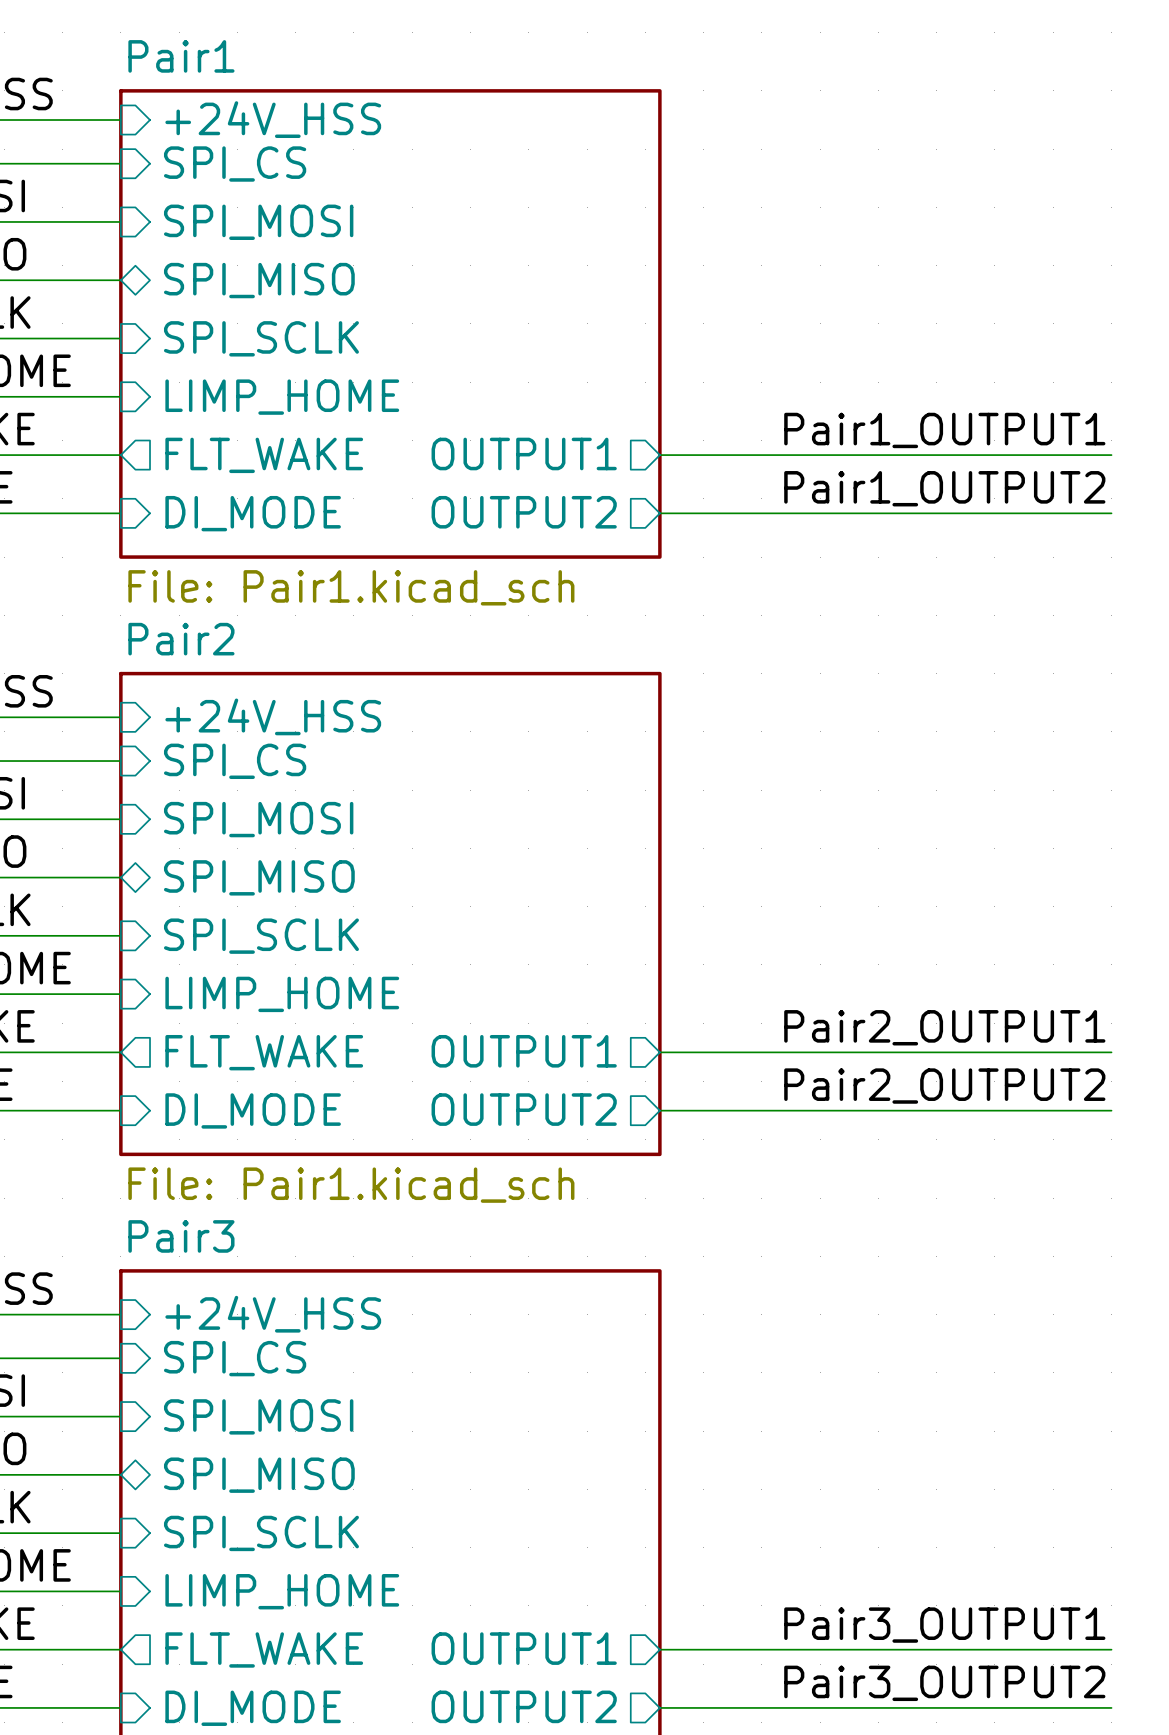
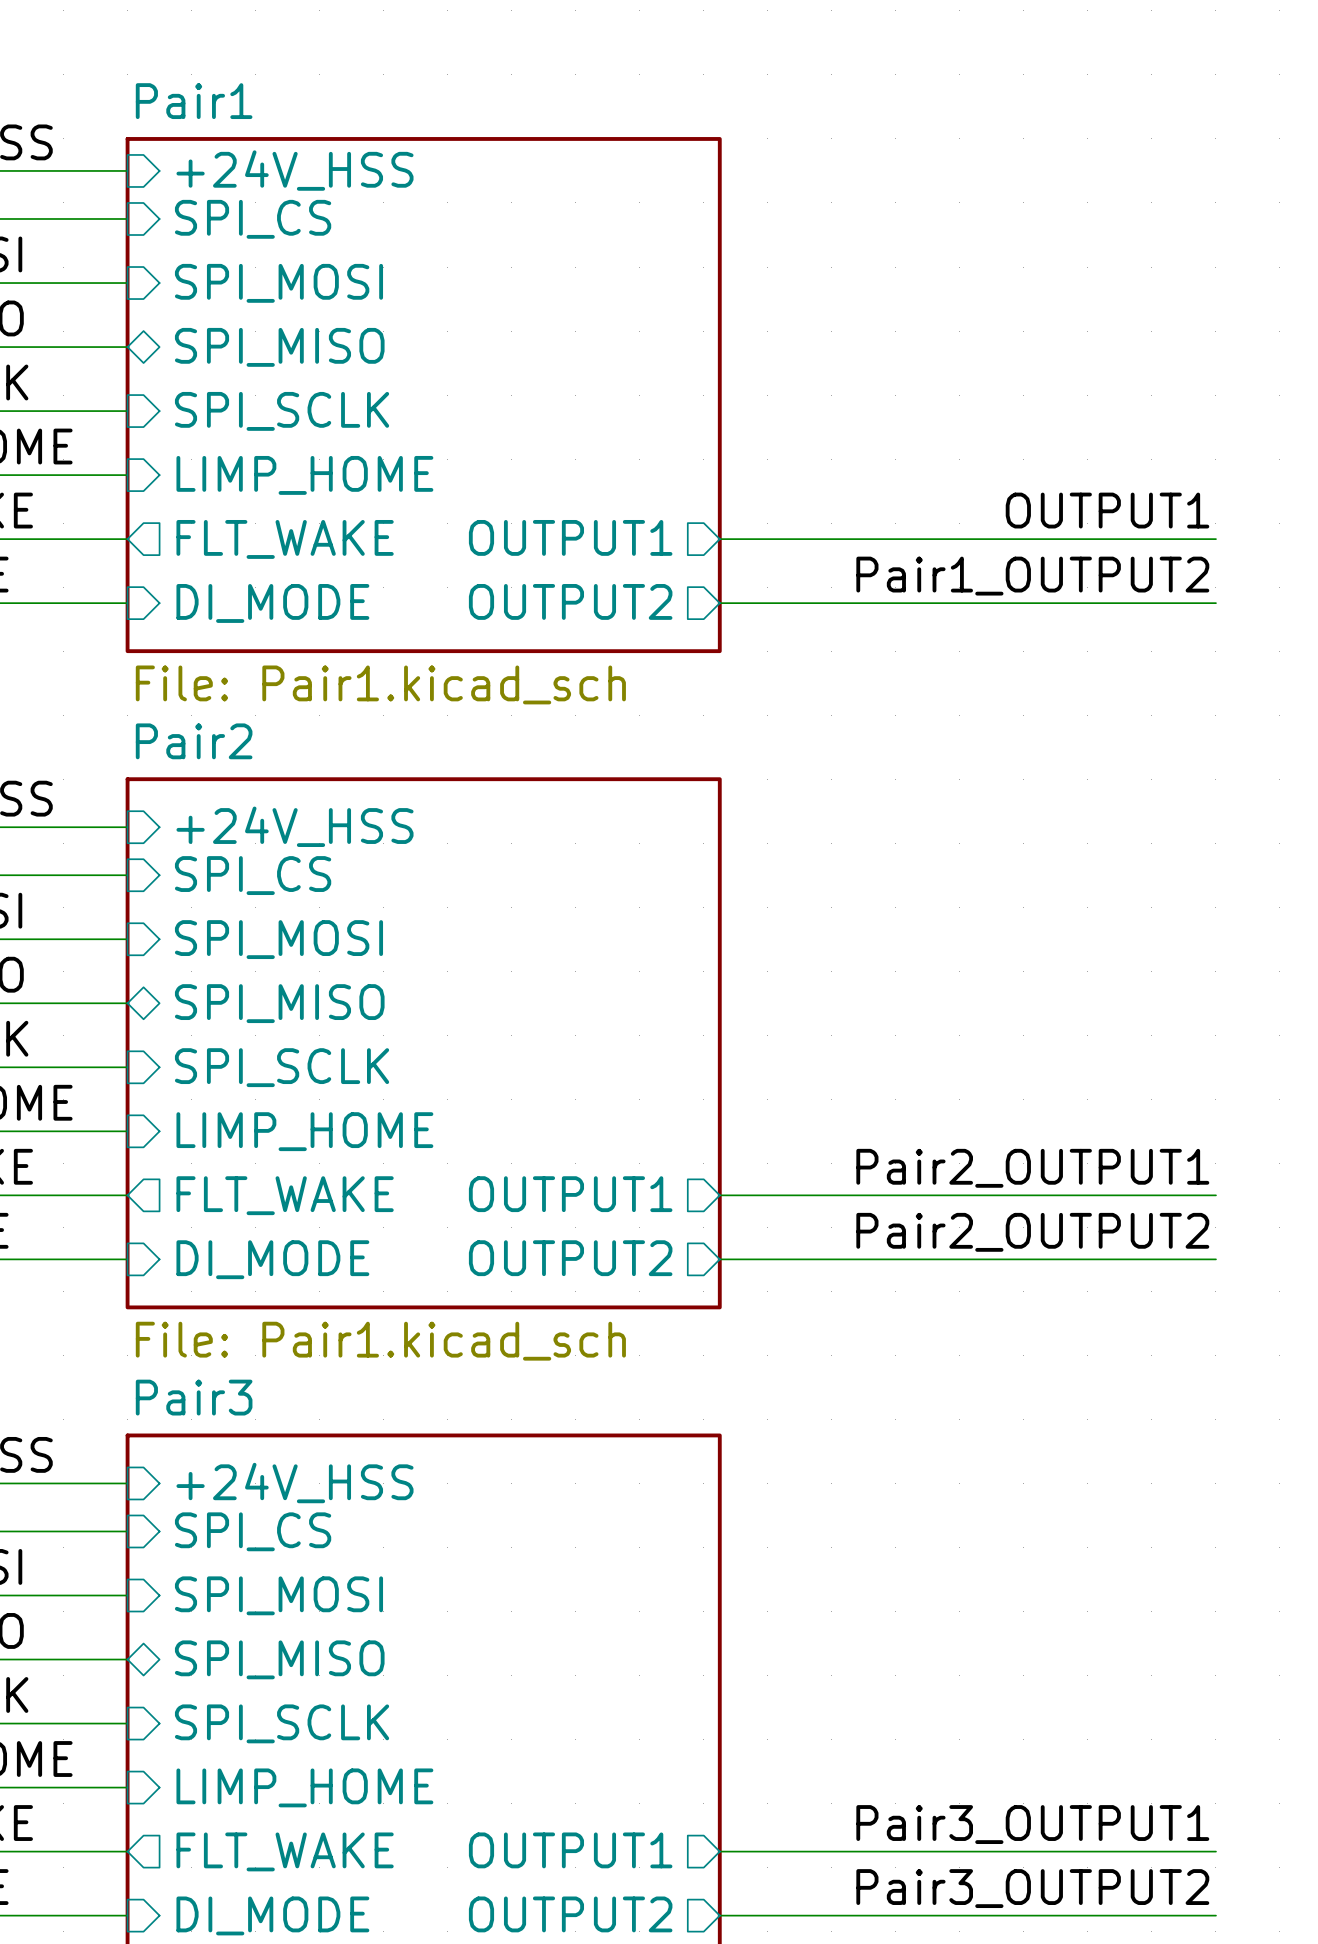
label: Pair1_OUTPUT1 (944, 430) -> OUTPUT1 (1107, 510)

